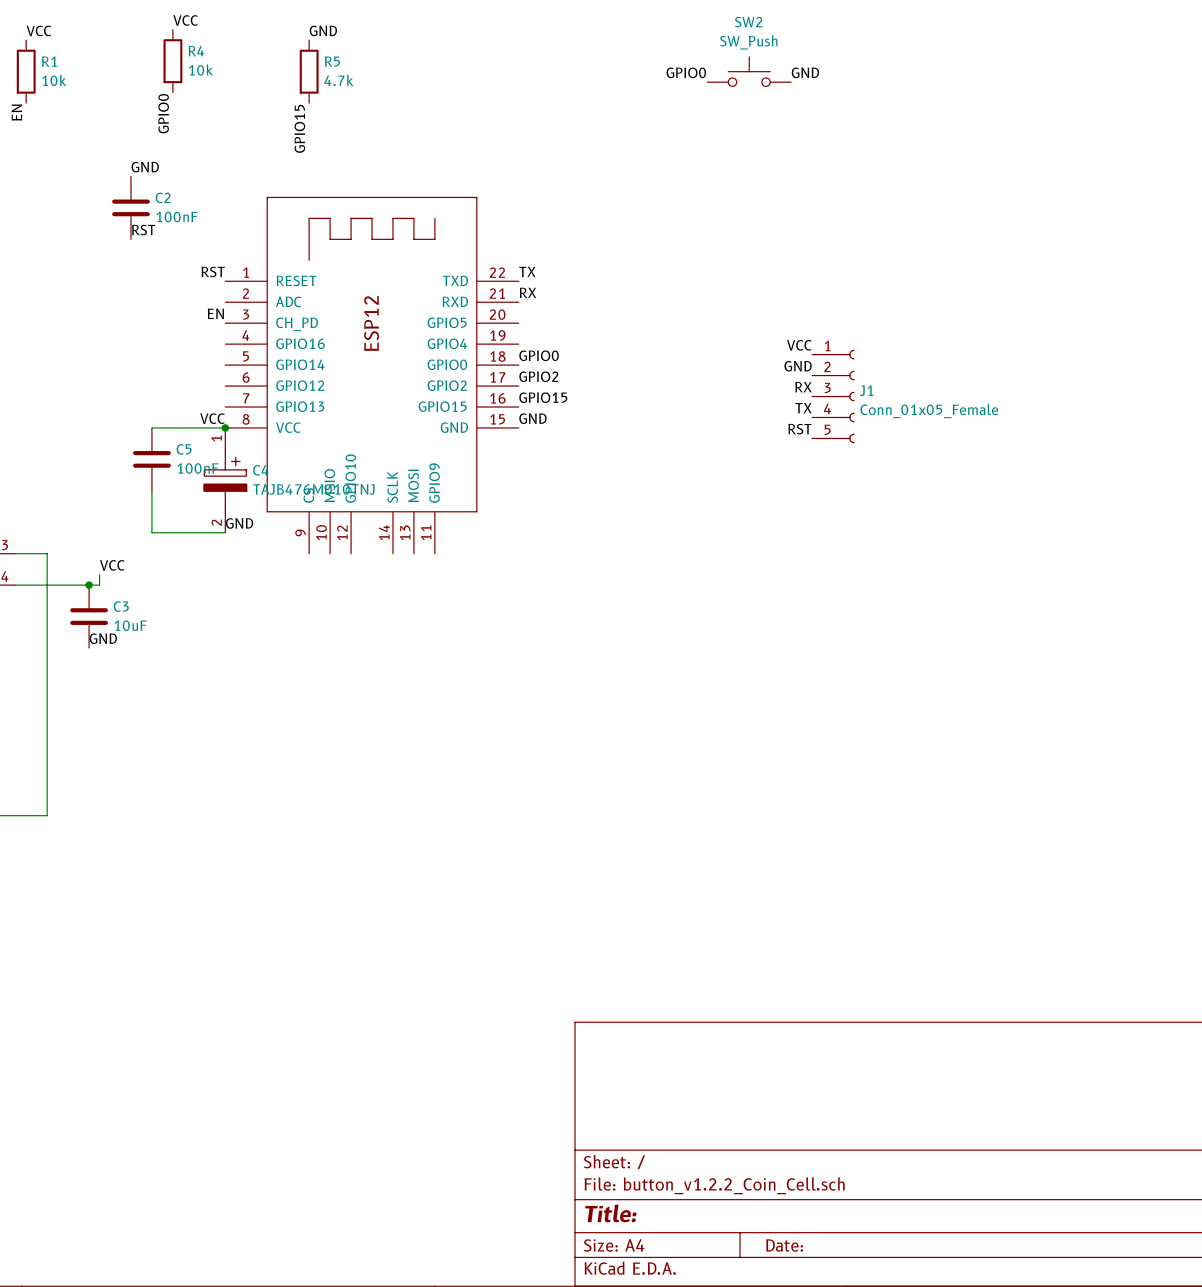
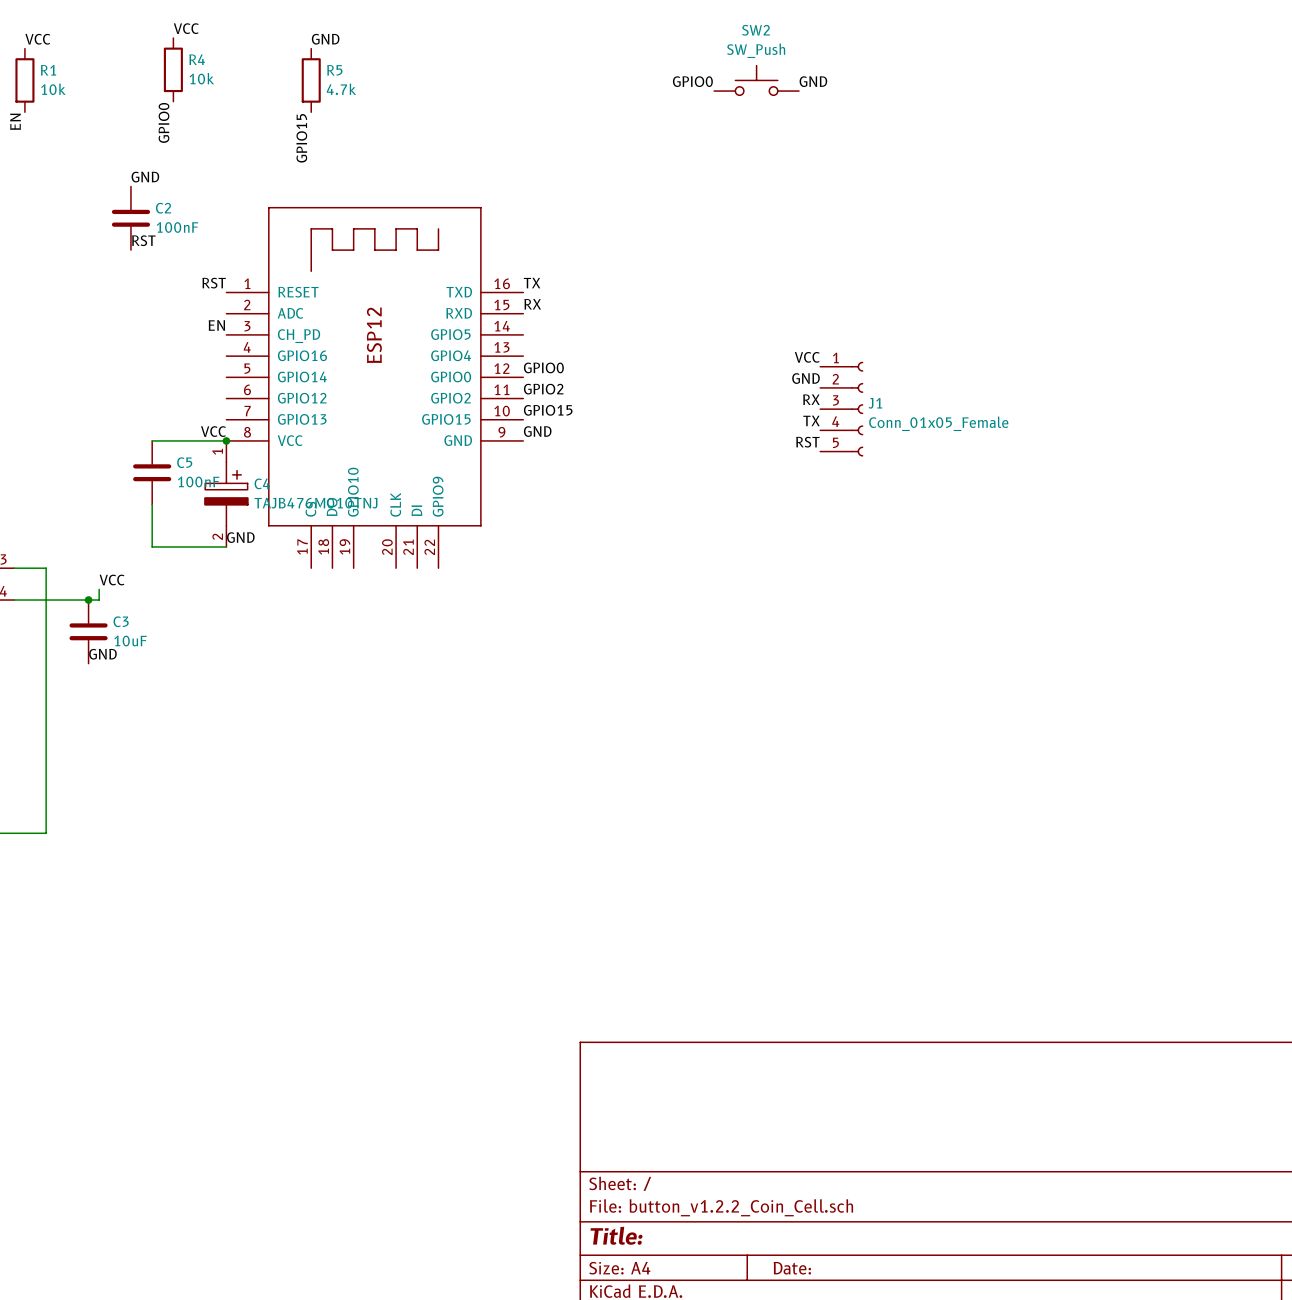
part symbol: [225, 197, 519, 554] -> [226, 207, 524, 569]

